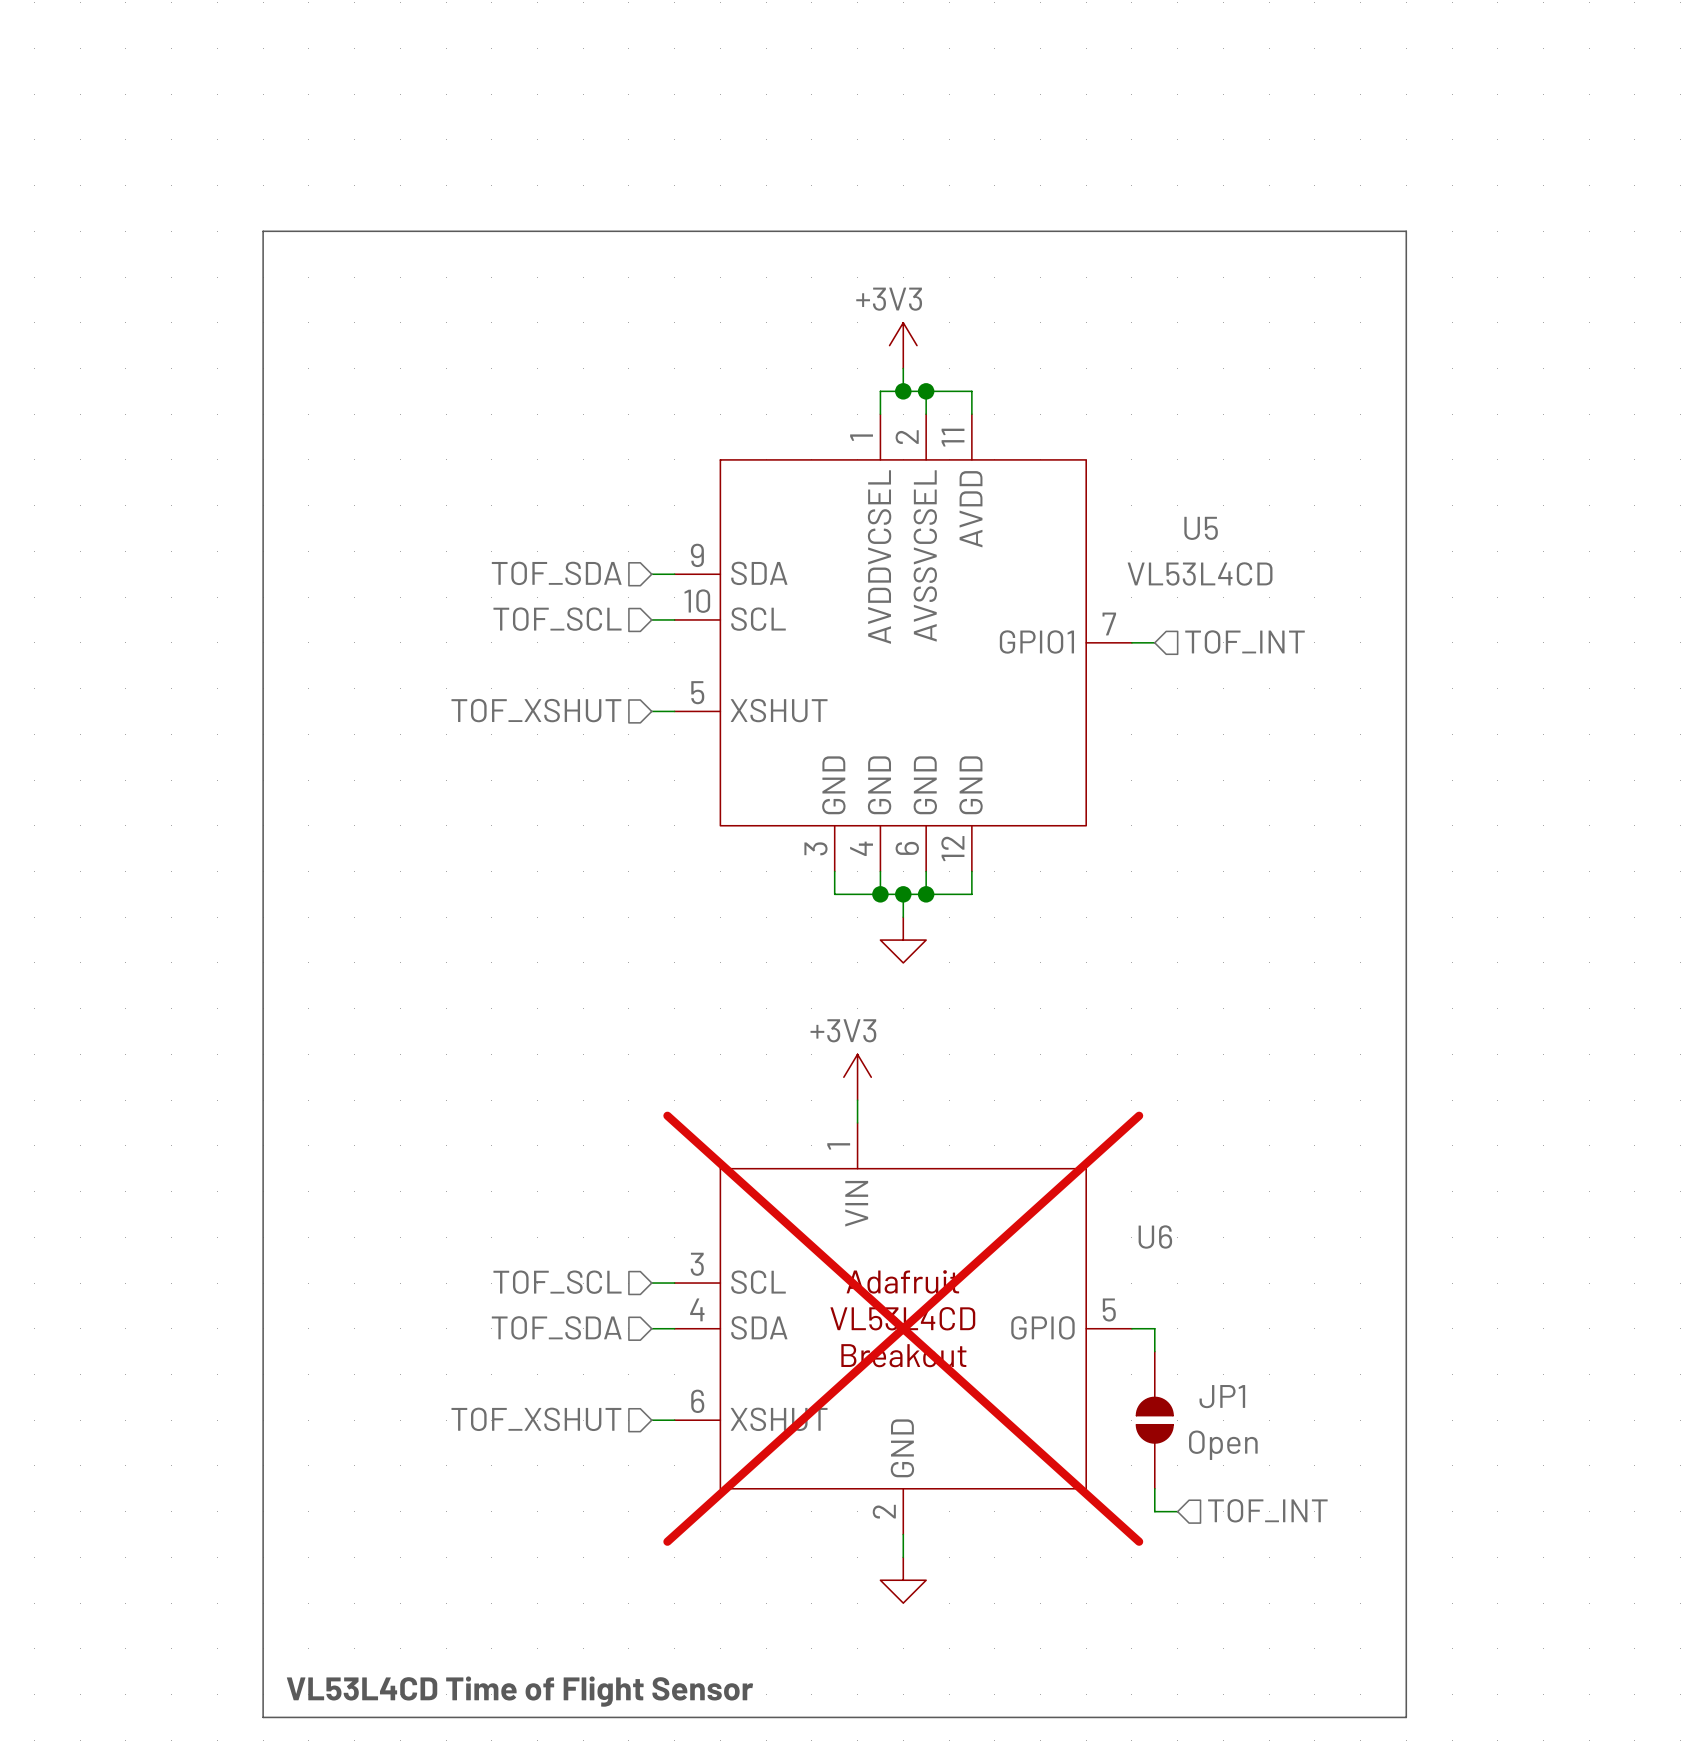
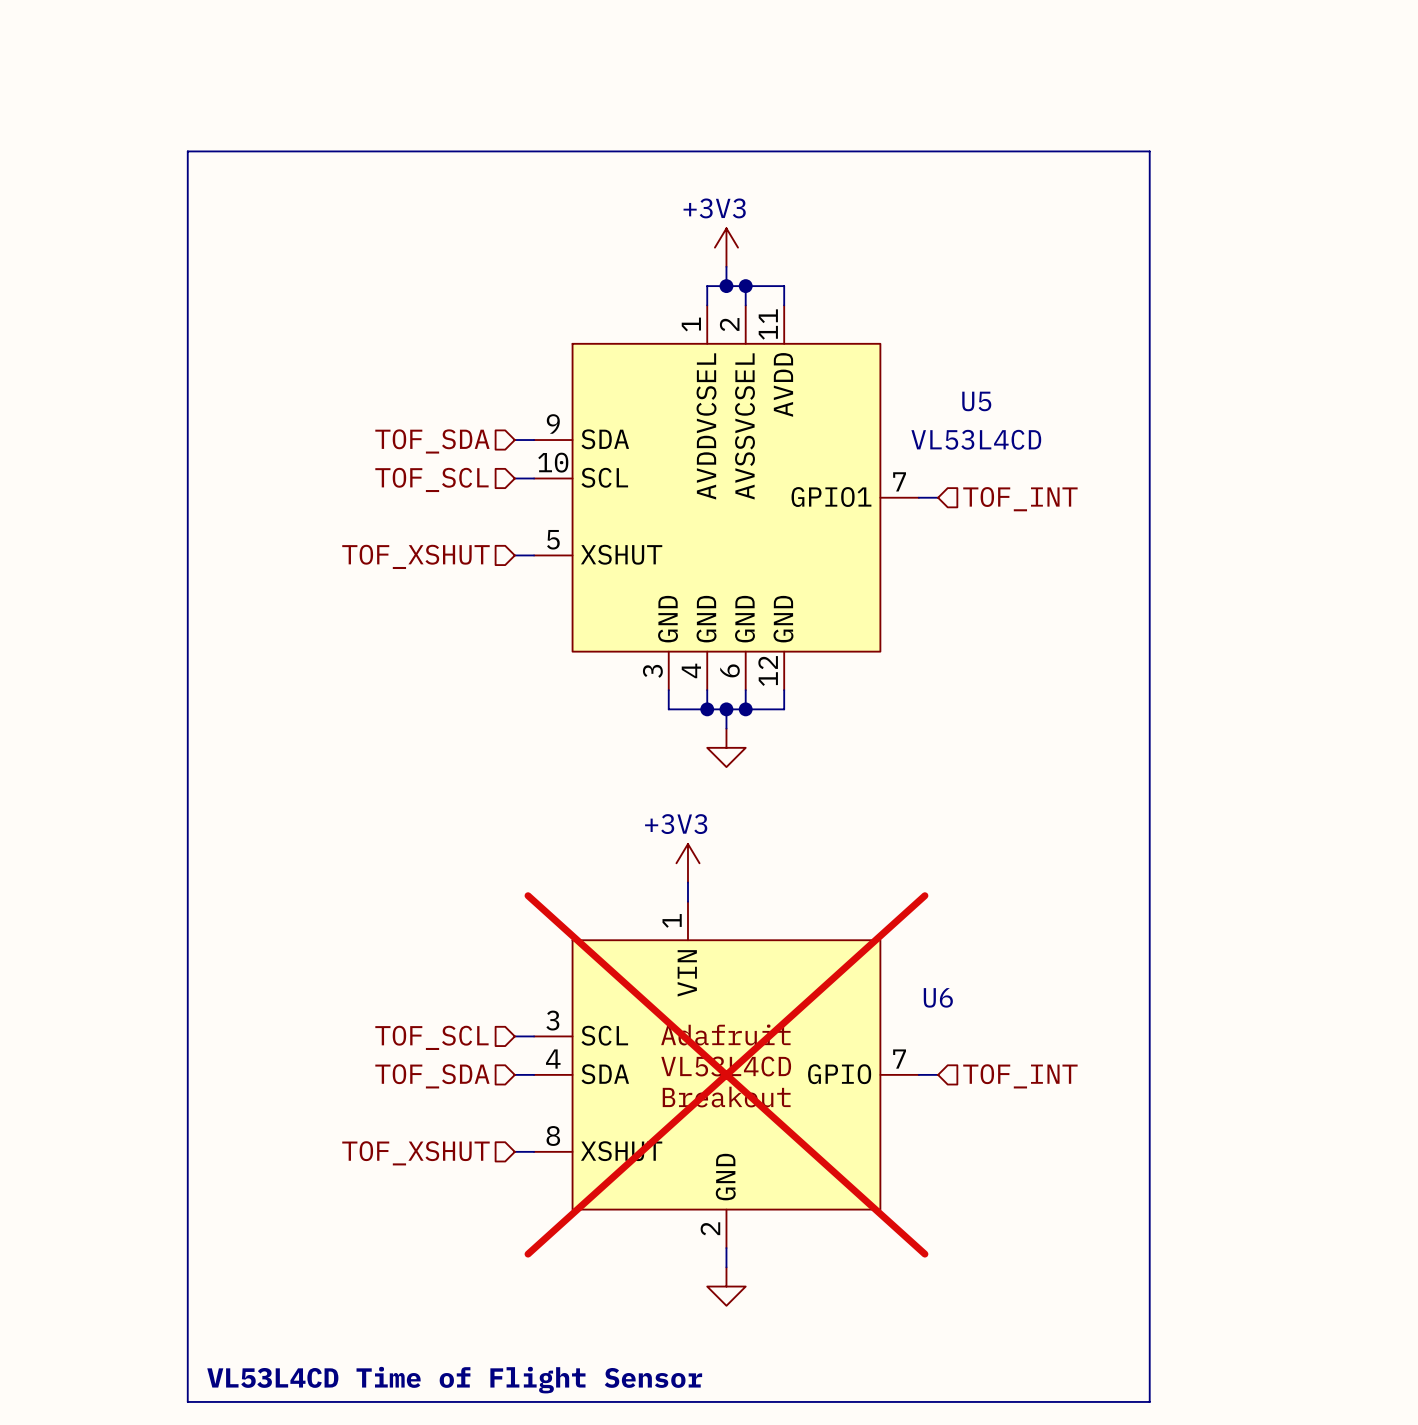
U6 pin number: 5 (1109, 1310) -> 7 (899, 1059)
wire: (1154, 1328) (1154, 1351) -> none
U6 pin number: 6 (697, 1401) -> 8 (553, 1135)
JP1: Open (1154, 1420) -> none
wire: (1154, 1488) (1154, 1511) (1177, 1511) -> none
hierarchical label position: TOF_INT (1267, 1510) -> TOF_INT (1020, 1076)

